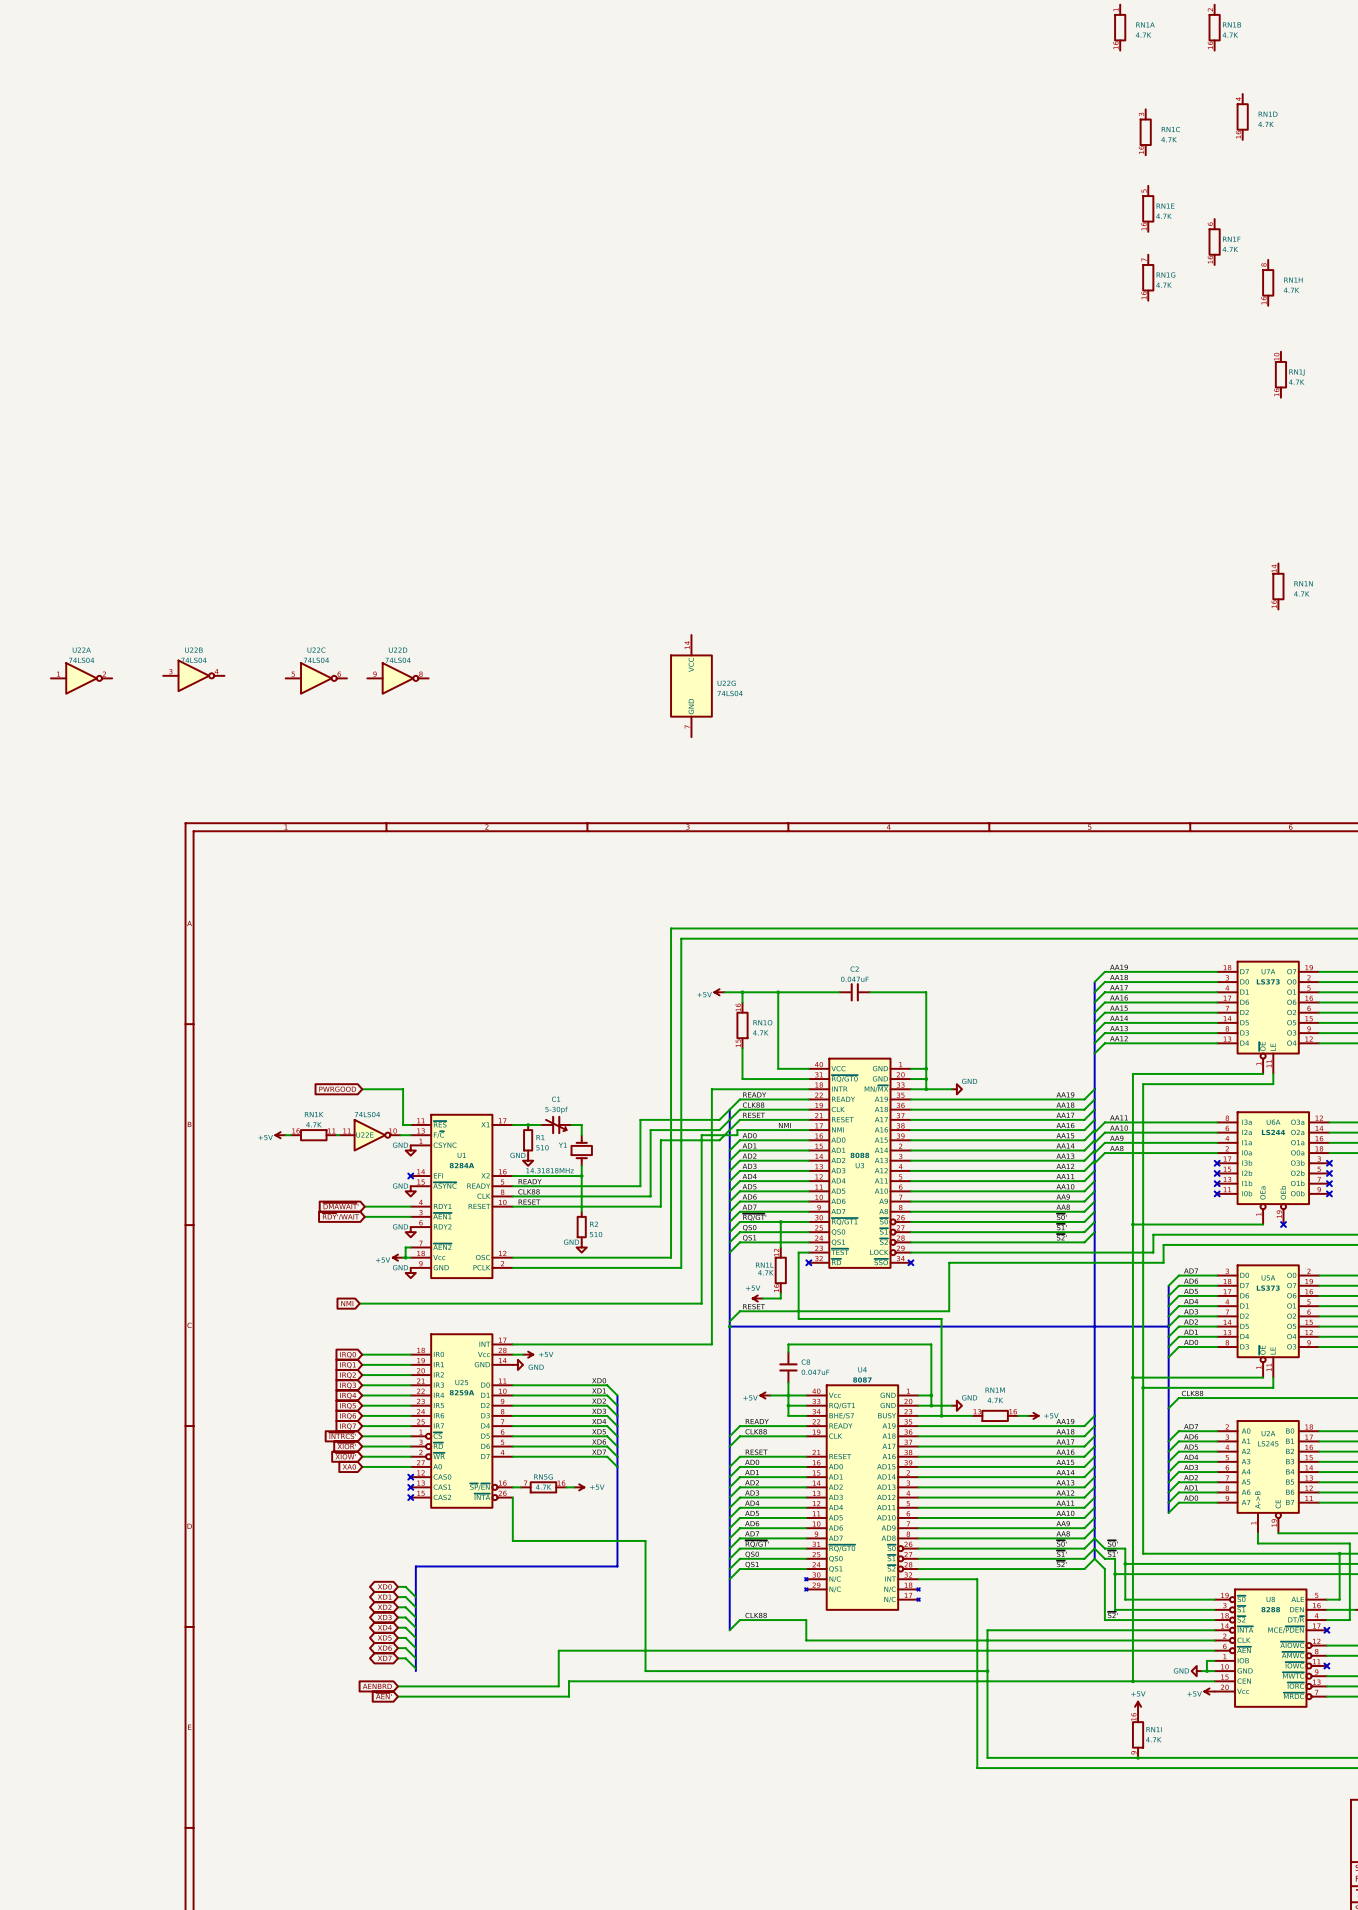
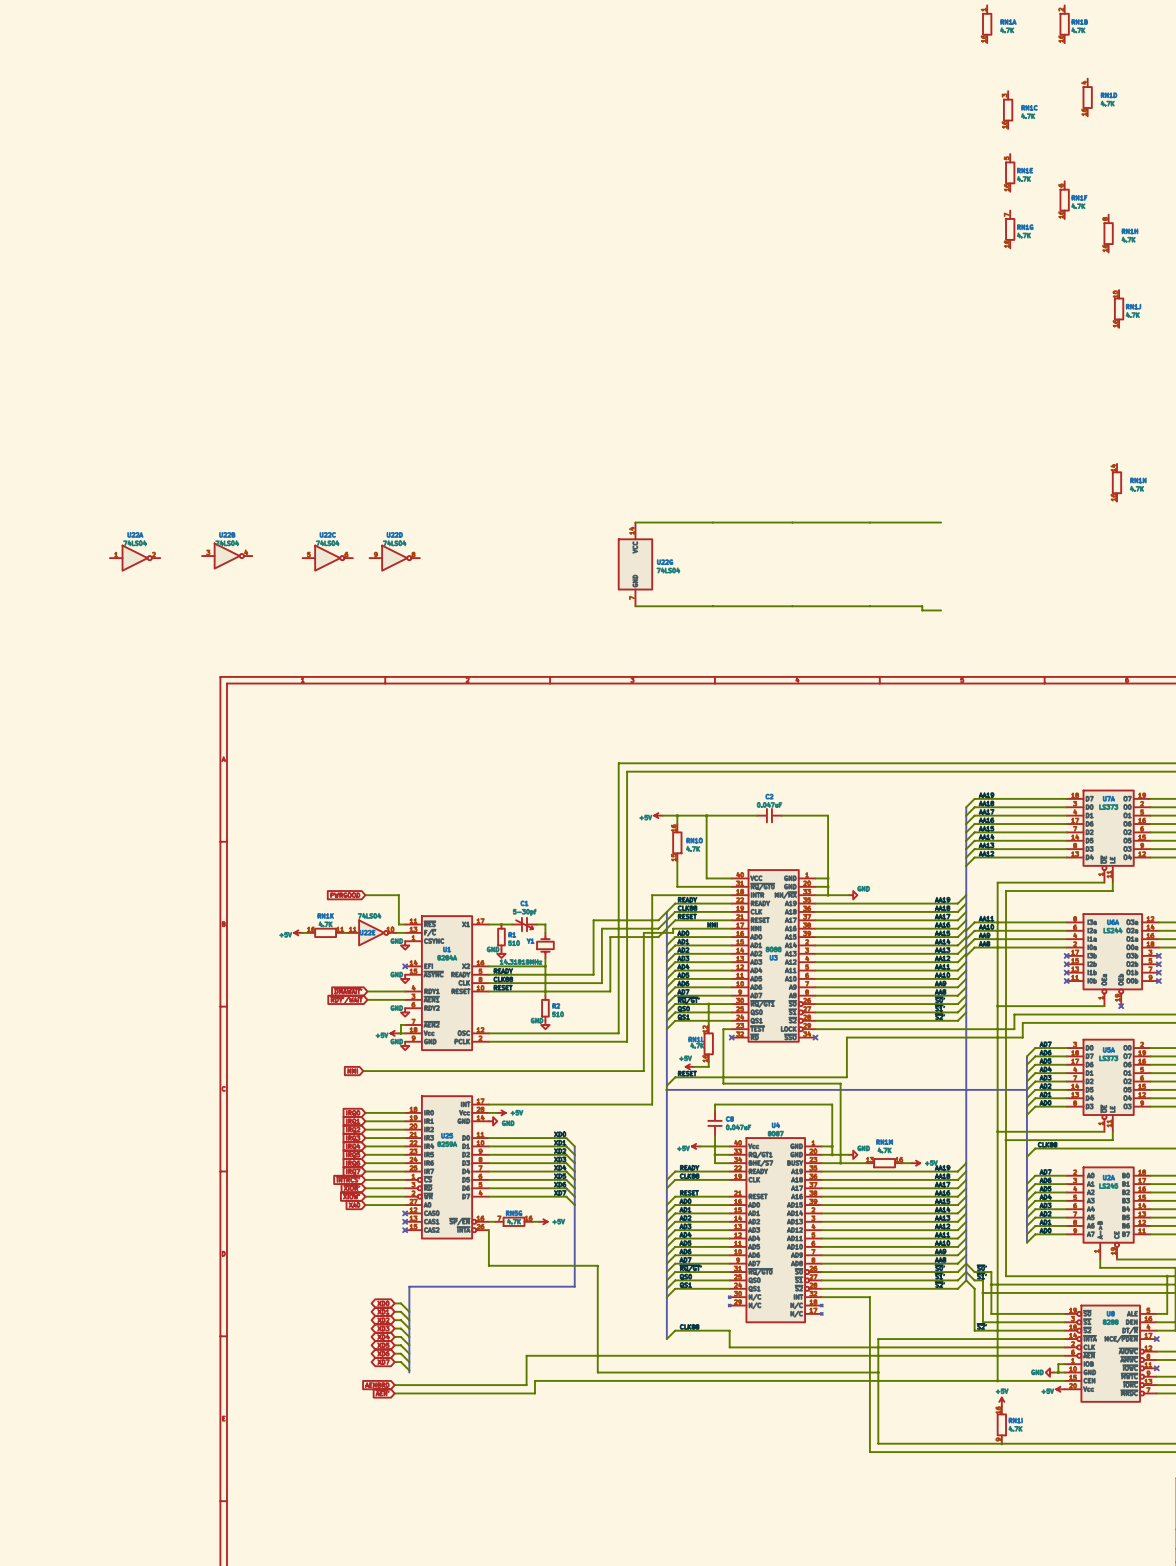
wire: none -> (635, 522) (941, 522)
wire: none -> (635, 606) (922, 606) (922, 610) (941, 610)

